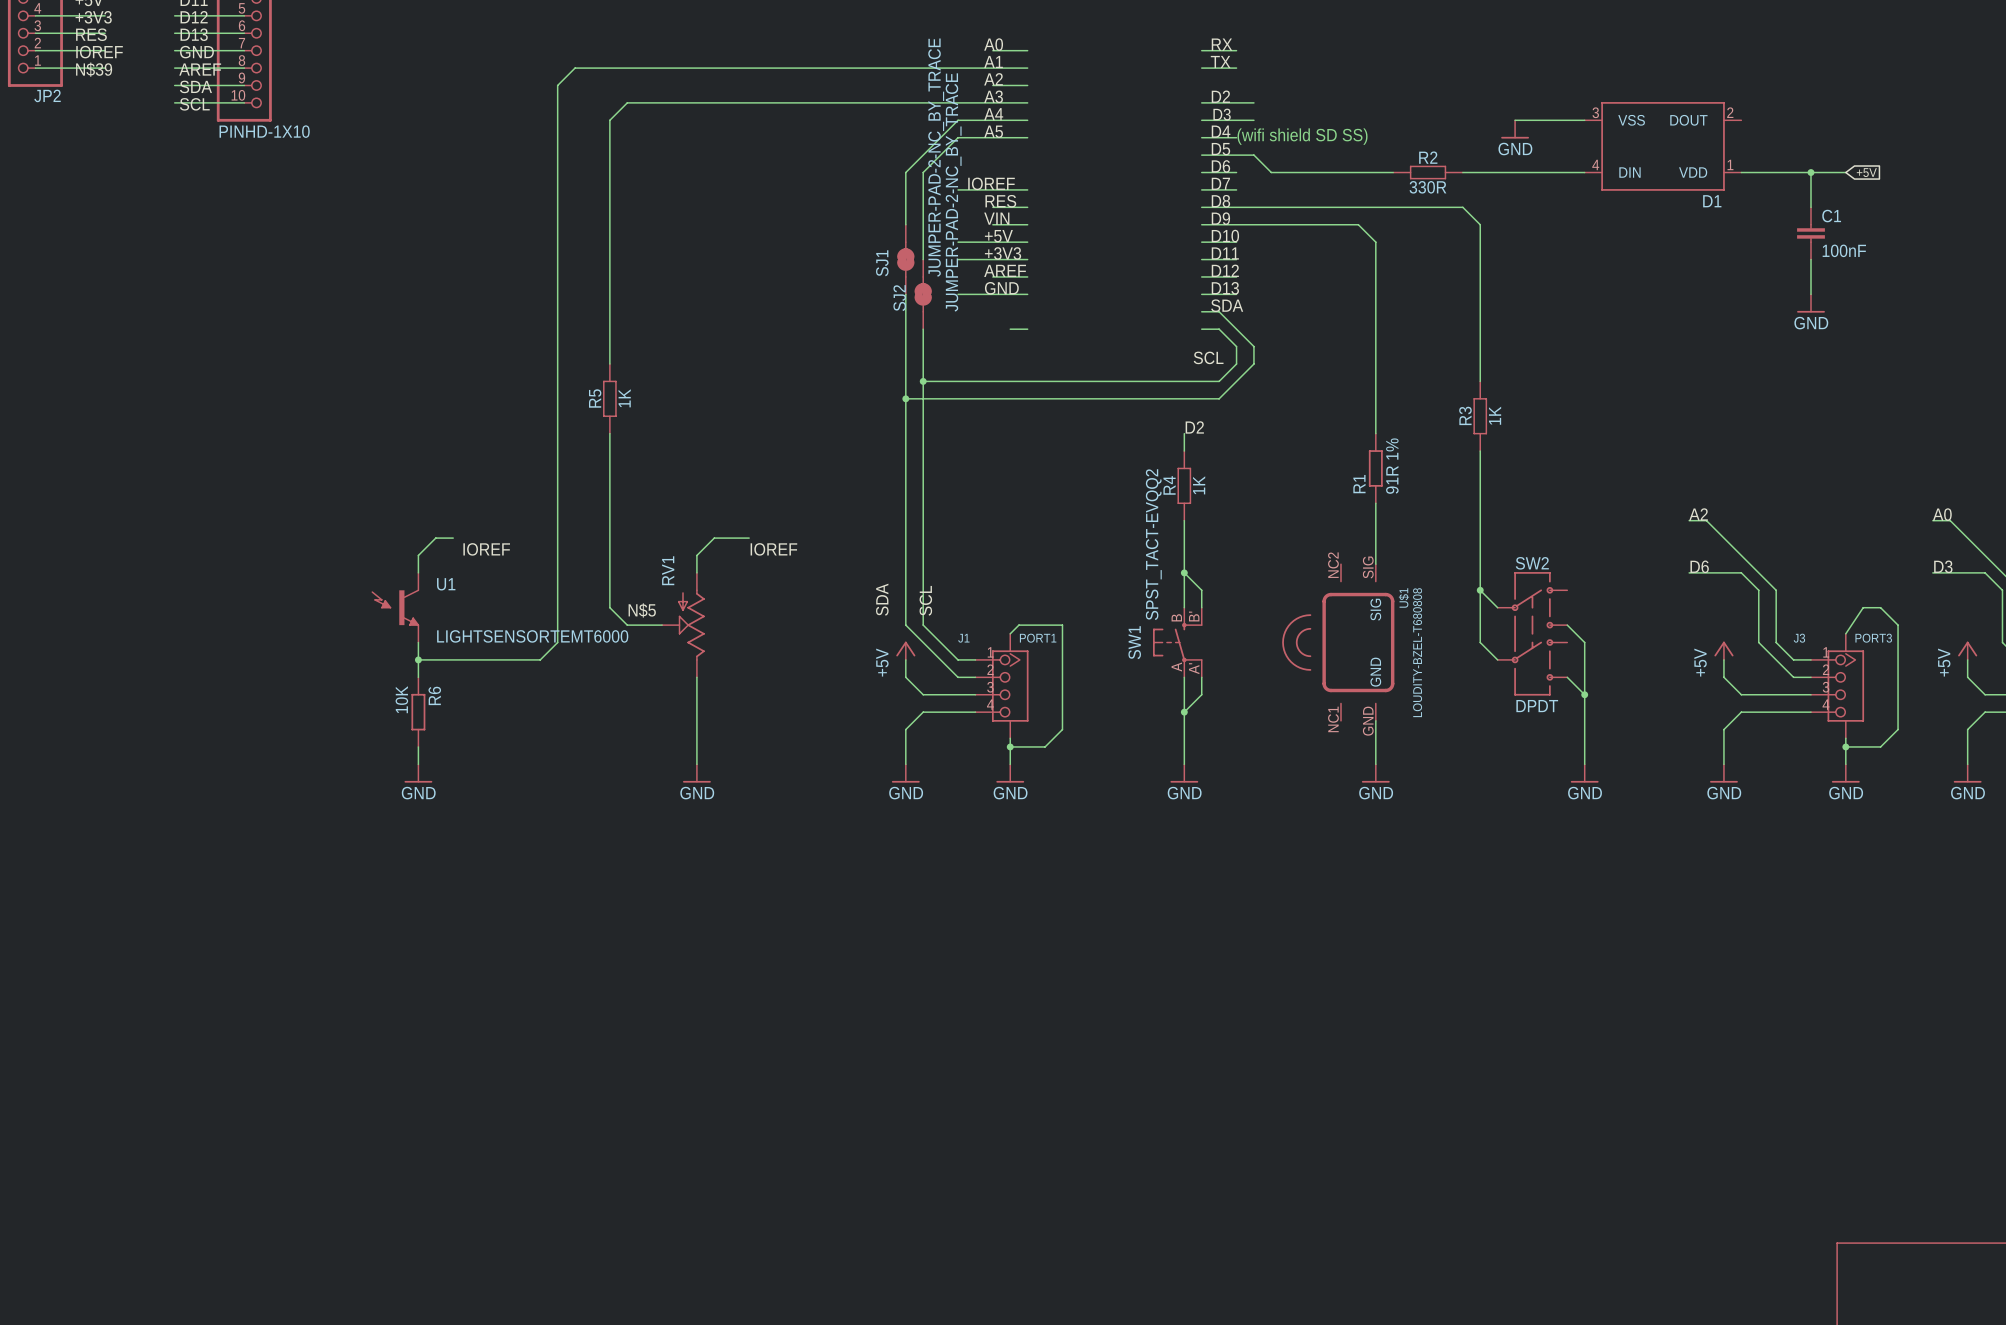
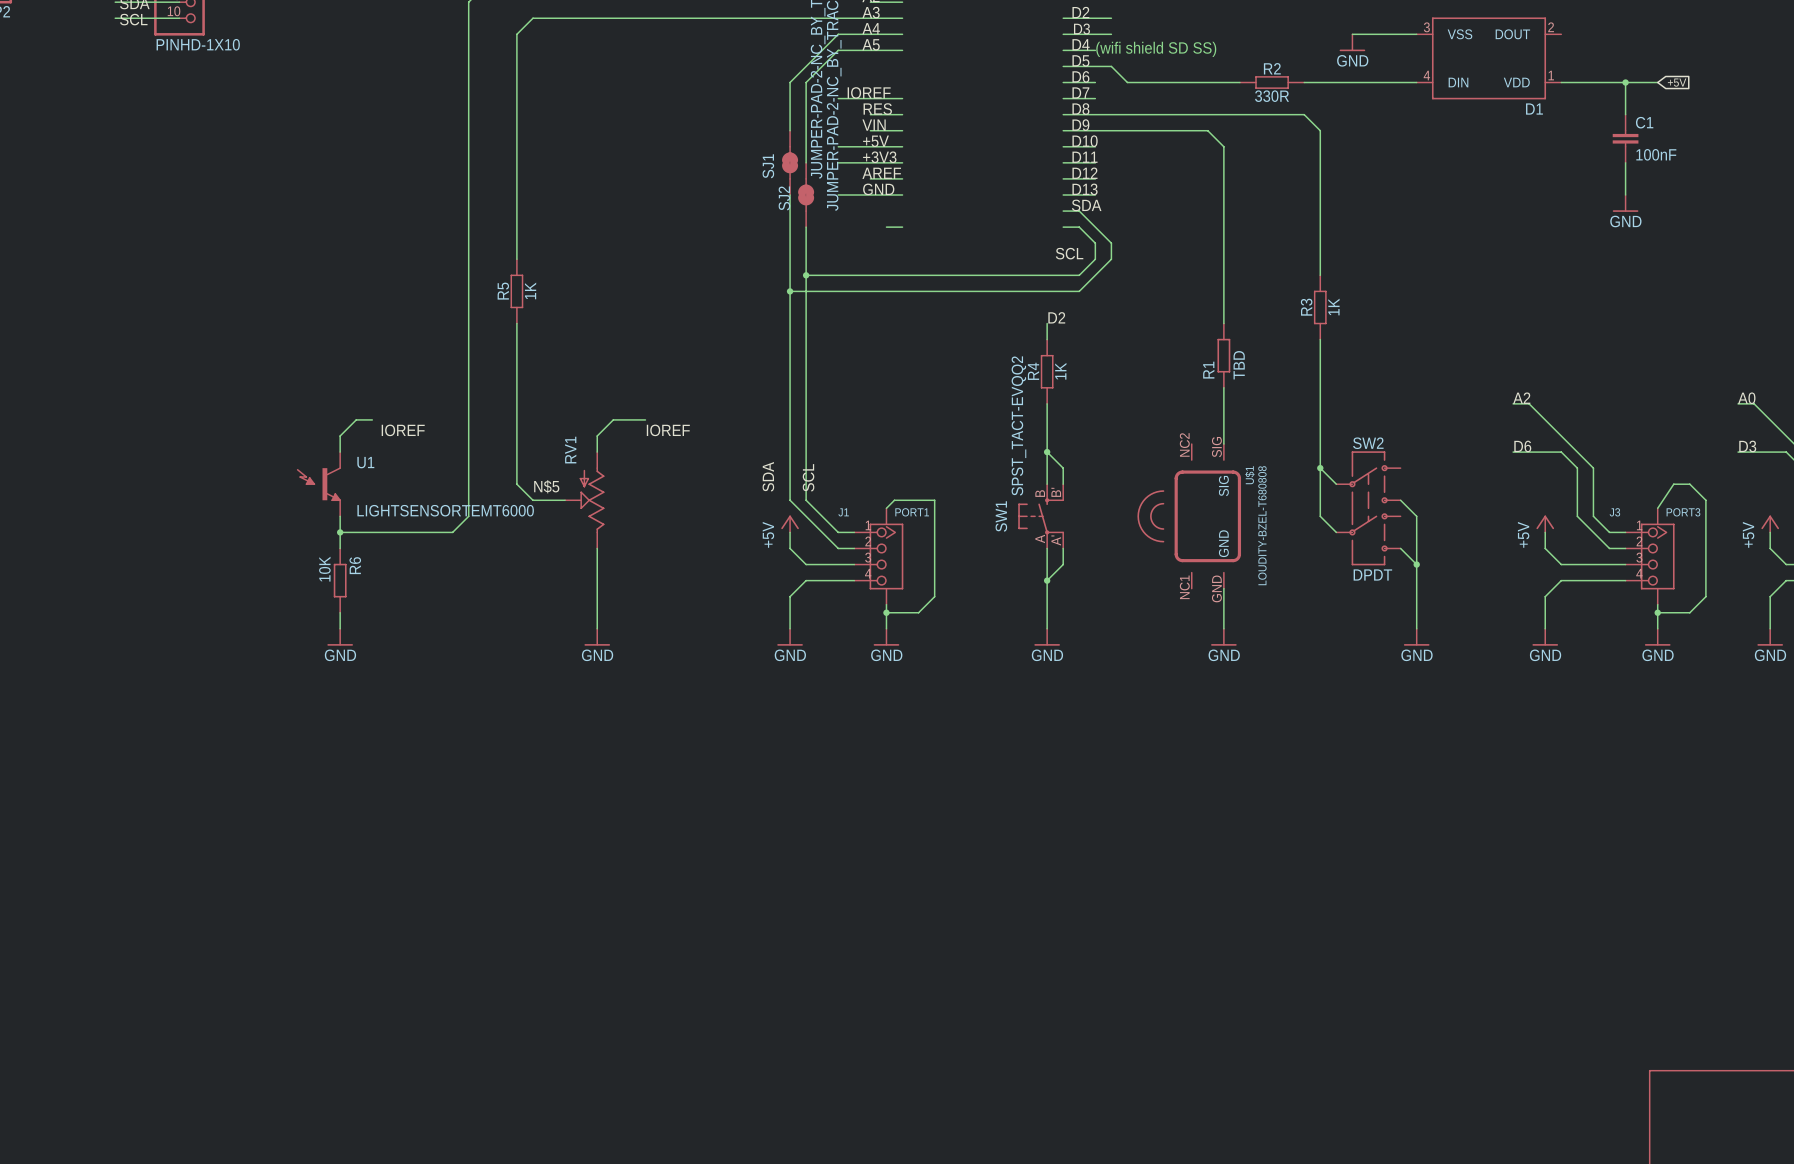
R1 value: 91R 1% (1392, 466) -> TBD (1239, 365)

